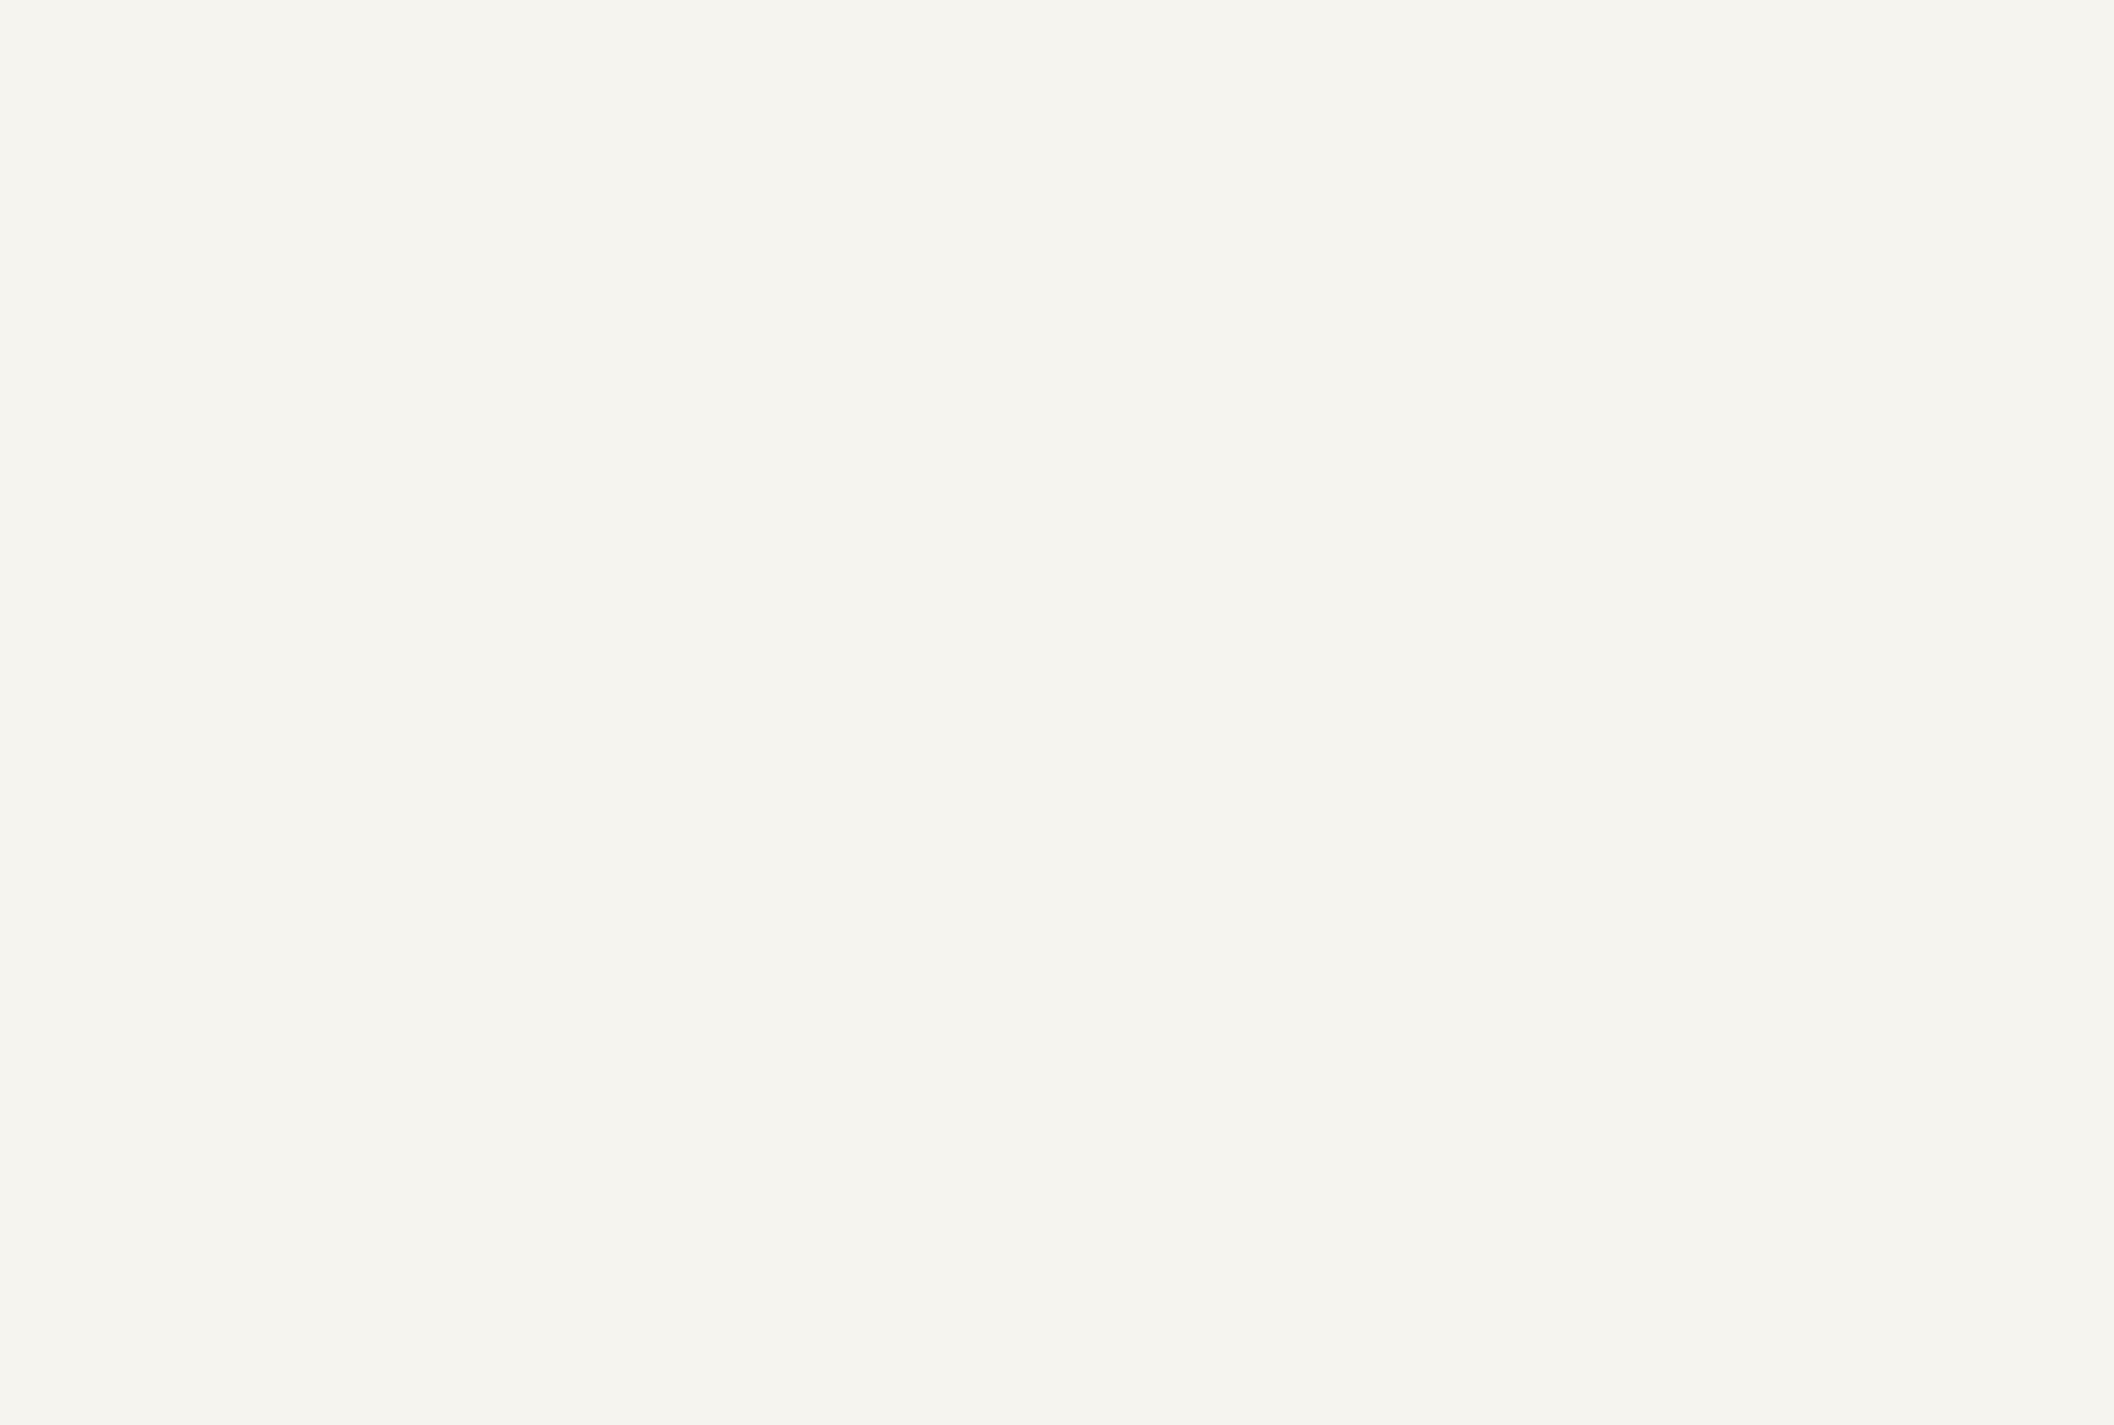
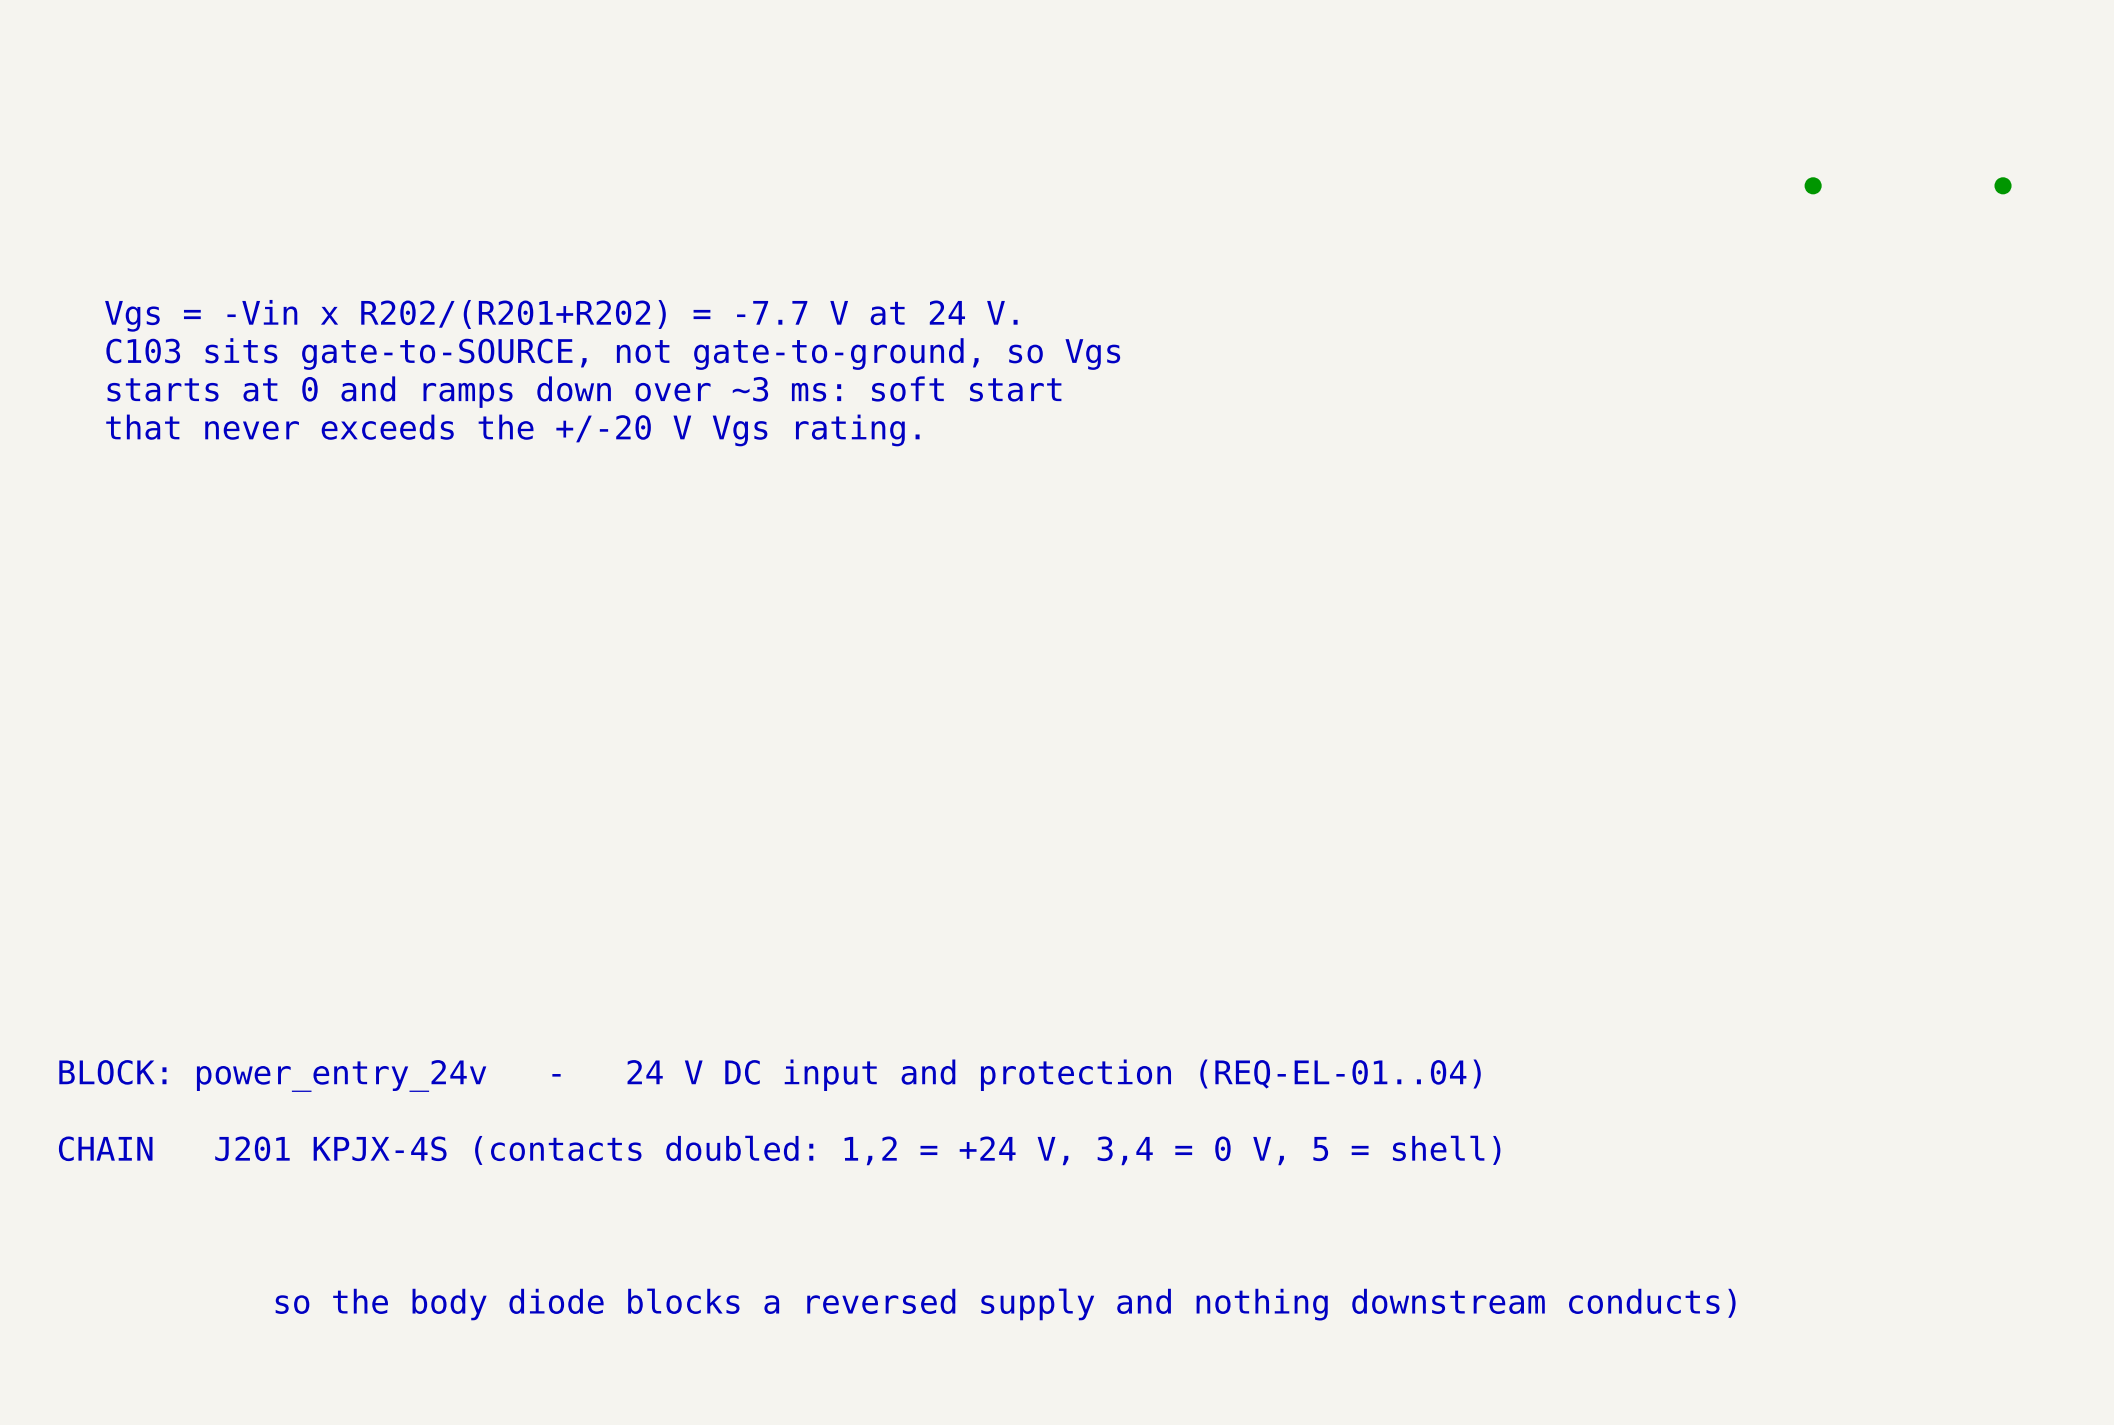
junction: none -> (1813, 185)
junction: none -> (2003, 185)
text: none -> Vgs = -Vin x R202/(R201+R202) = -7.7 V at 24 V. (561, 315)
text: none -> C103 sits gate-to-SOURCE, not gate-to-ground, so Vgs (613, 354)
text: none -> starts at 0 and ramps down over ~3 ms: soft start (584, 392)
text: none -> that never exceeds the +/-20 V Vgs rating. (512, 430)
text: none -> BLOCK: power_entry_24v - 24 V DC input and protection (REQ-EL-01..04) (770, 1075)
text: none -> CHAIN J201 KPJX-4S (contacts doubled: 1,2 = +24 V, 3,4 = 0 V, 5 = shell) (779, 1150)
text: none -> so the body diode blocks a reversed supply and nothing downstream conducts) (1005, 1304)

